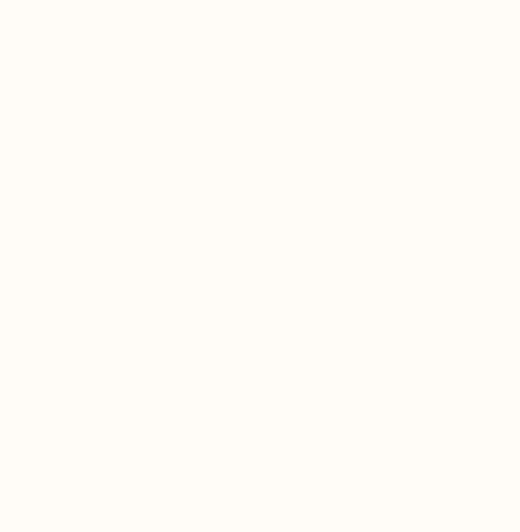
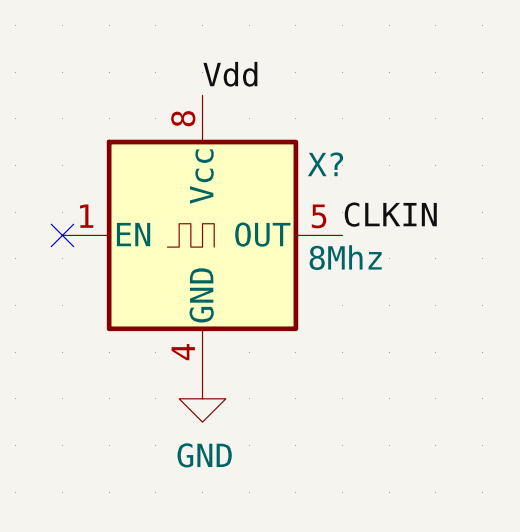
label: none -> Vdd (230, 74)
label: none -> CLKIN (390, 214)
no-connect mark: none -> (62, 235)
X?: none -> 8Mhz (202, 235)
power symbol: none -> GND (202, 398)

